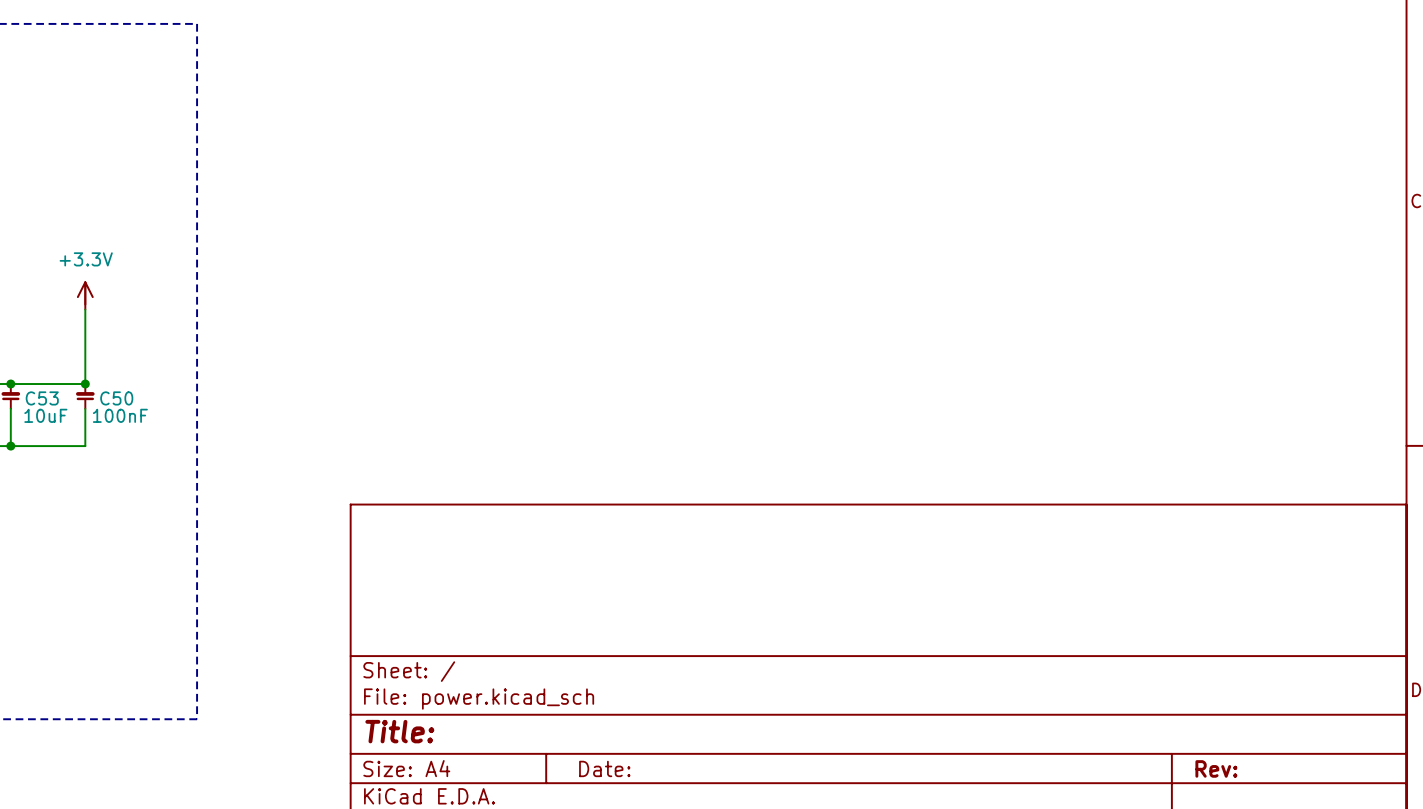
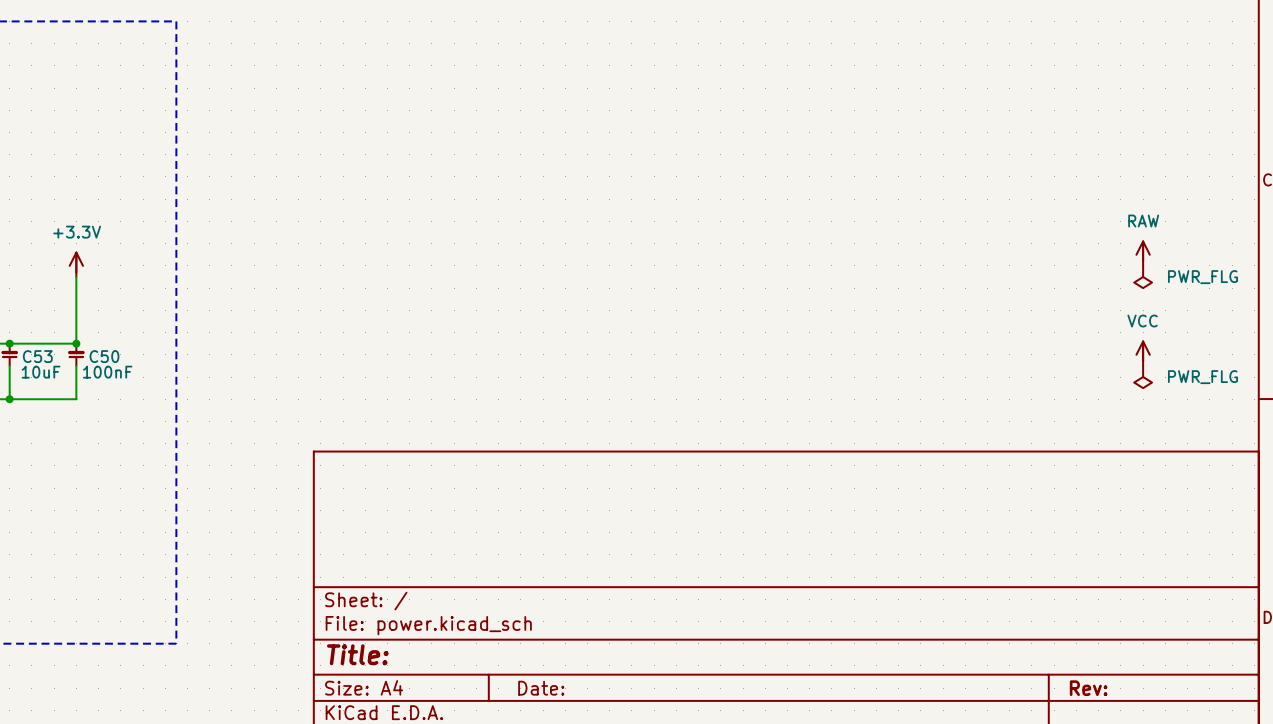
power symbol: none -> RAW (1143, 253)
power symbol: none -> PWR_FLG (1143, 276)
power symbol: none -> VCC (1143, 353)
power symbol: none -> PWR_FLG (1143, 377)

